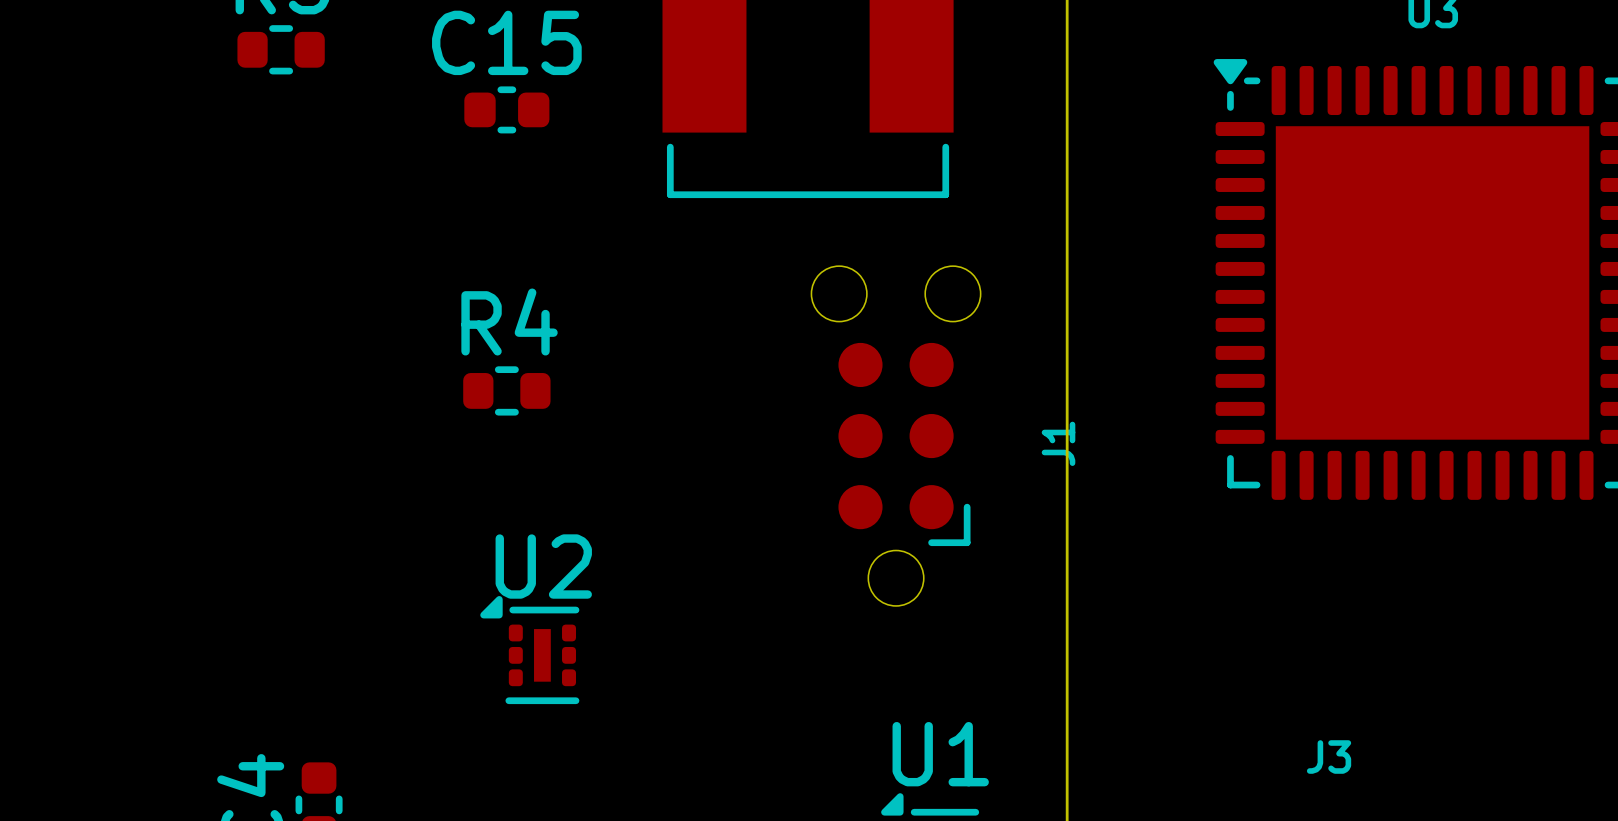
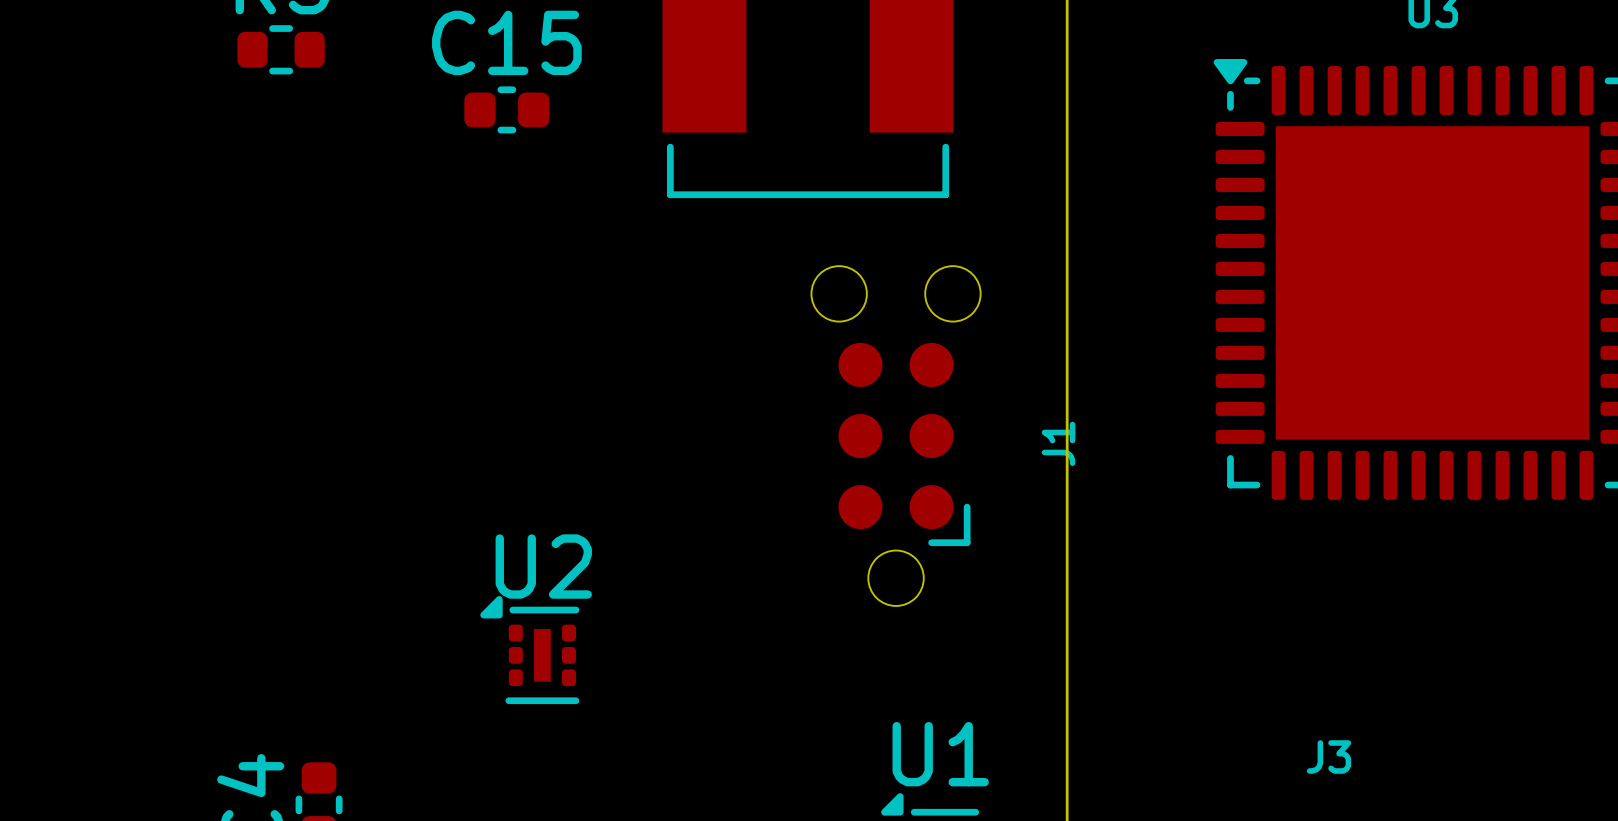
R4: (506, 390) -> none

